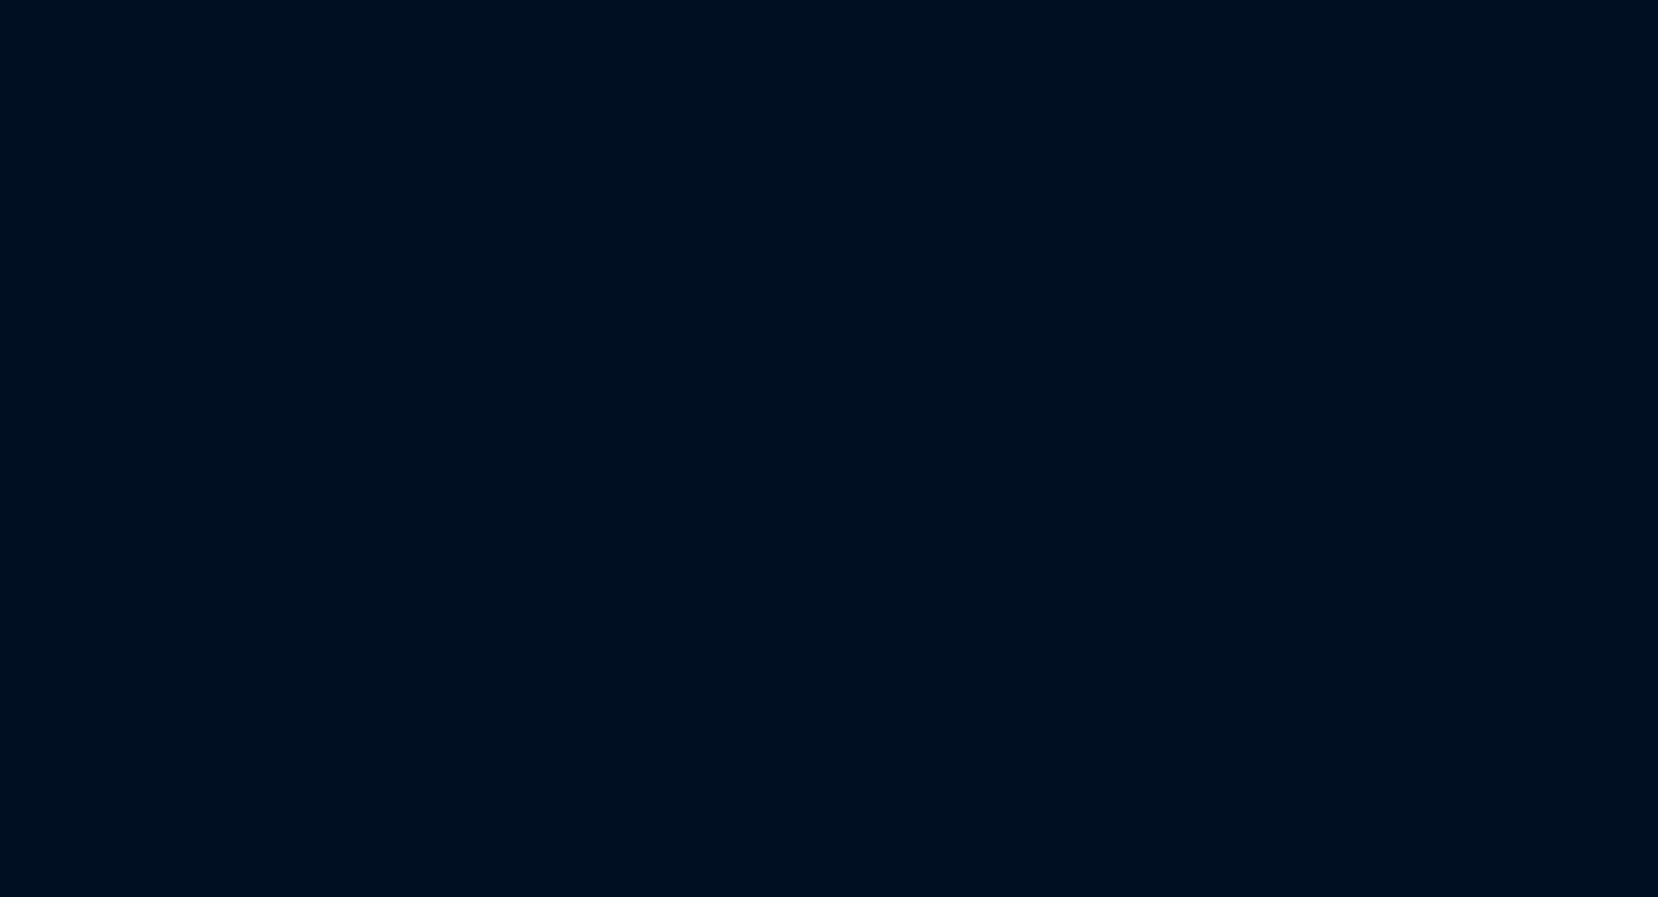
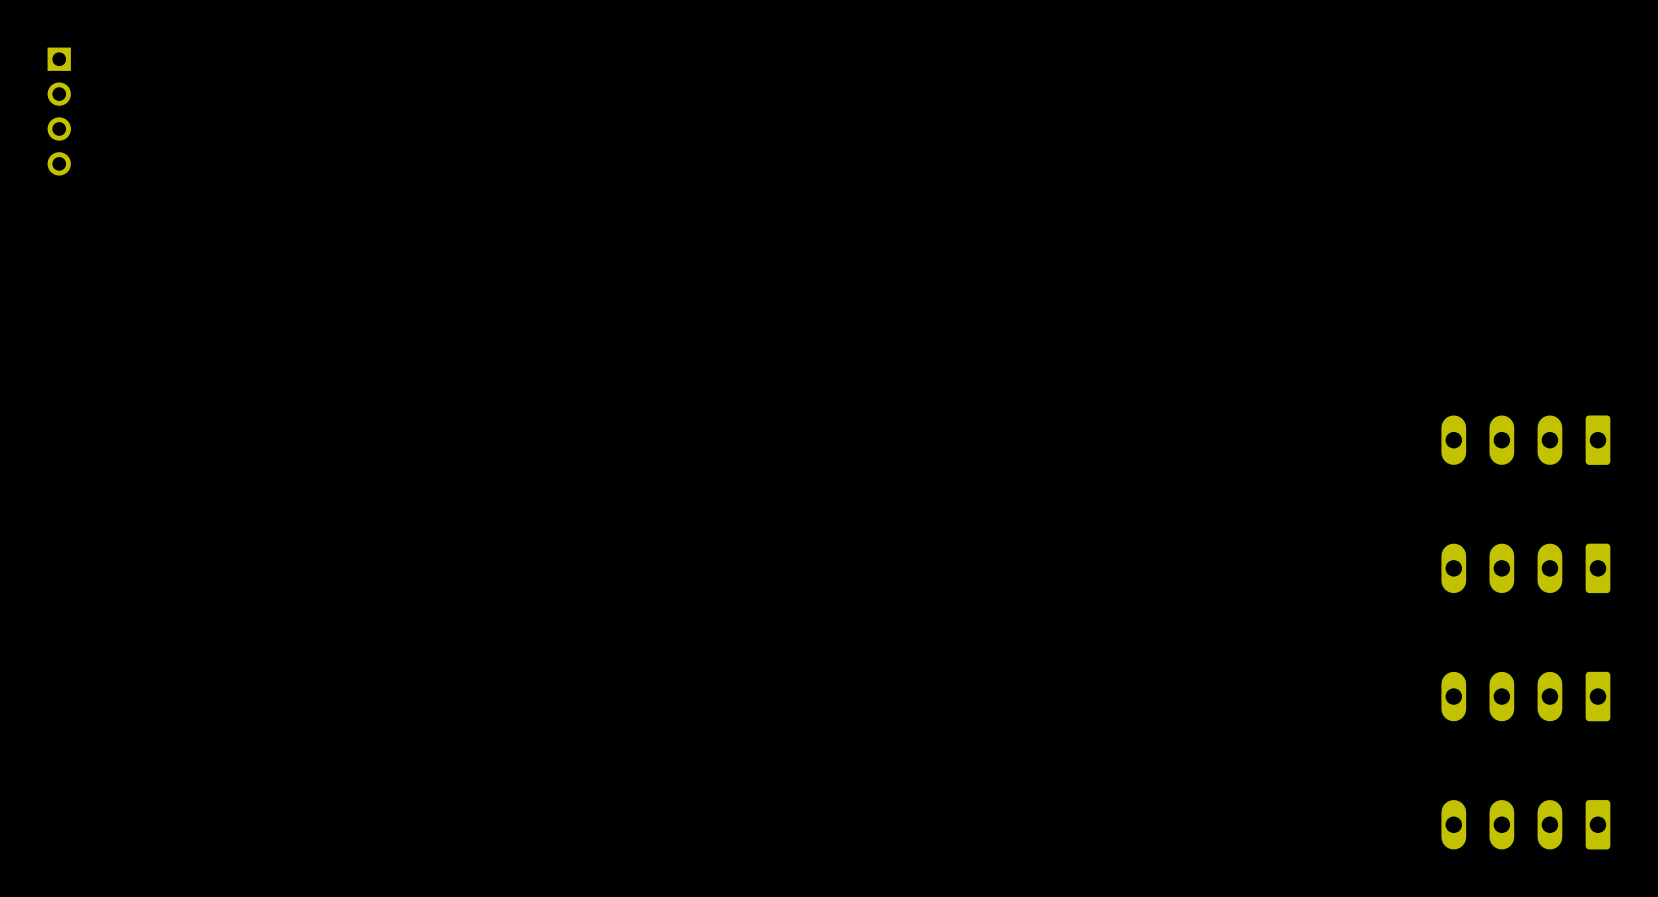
part: none -> (59, 111)
part: none -> (1525, 440)
part: none -> (1525, 568)
part: none -> (1525, 696)
part: none -> (1525, 824)

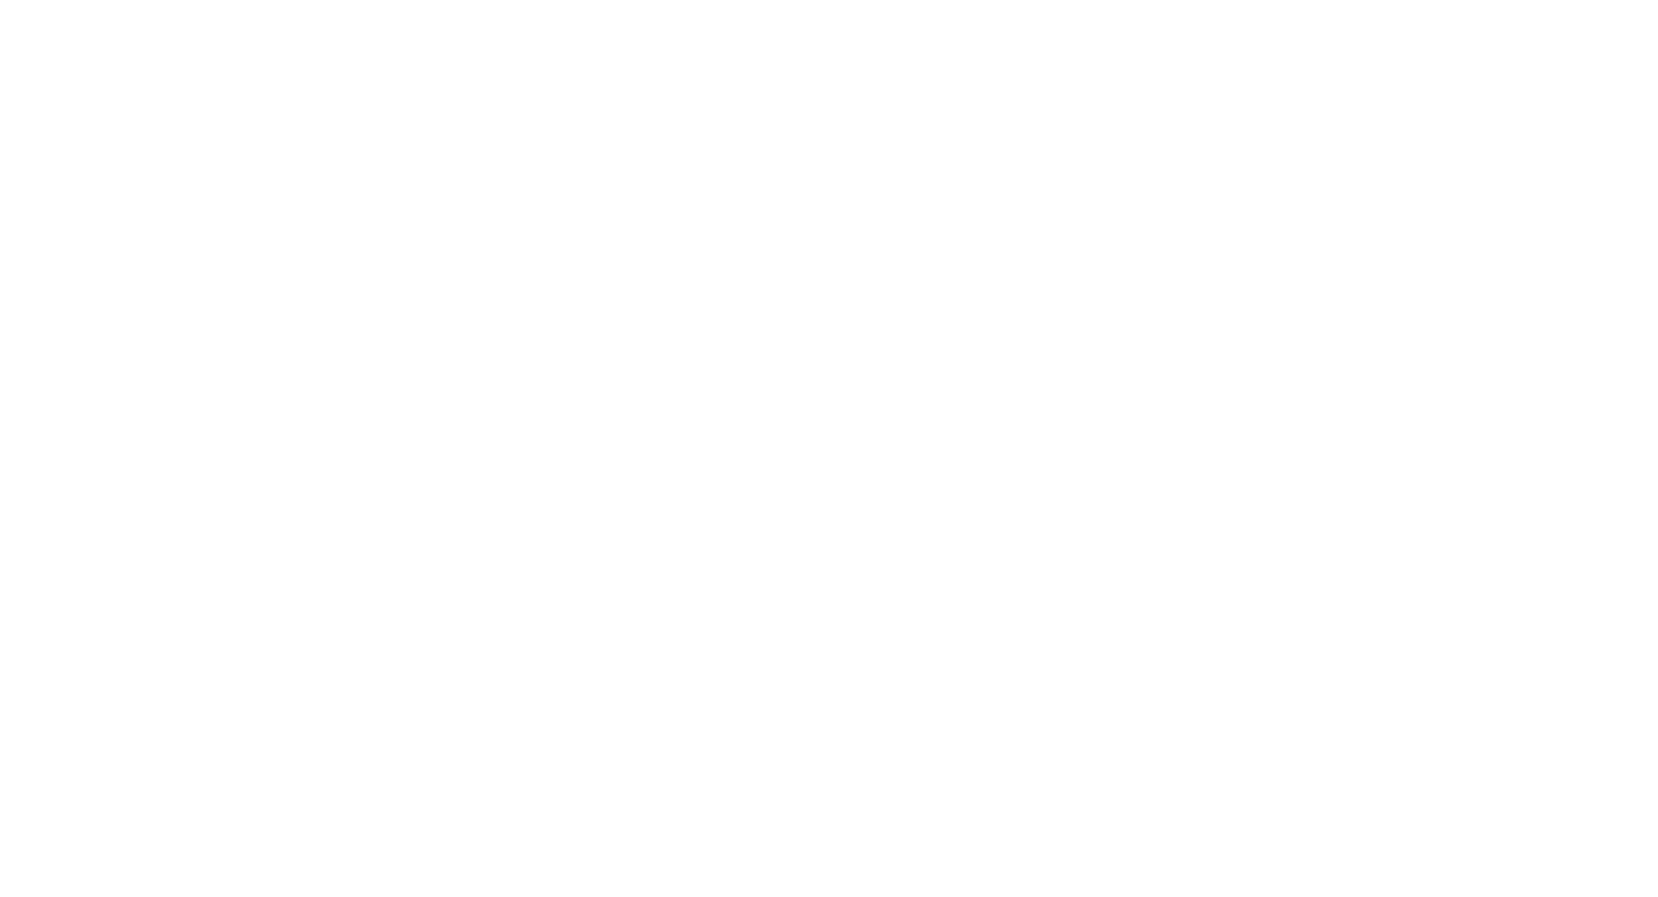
part: (59, 111) -> none
part: (1525, 440) -> none
part: (1525, 568) -> none
part: (1525, 696) -> none
part: (1525, 824) -> none

